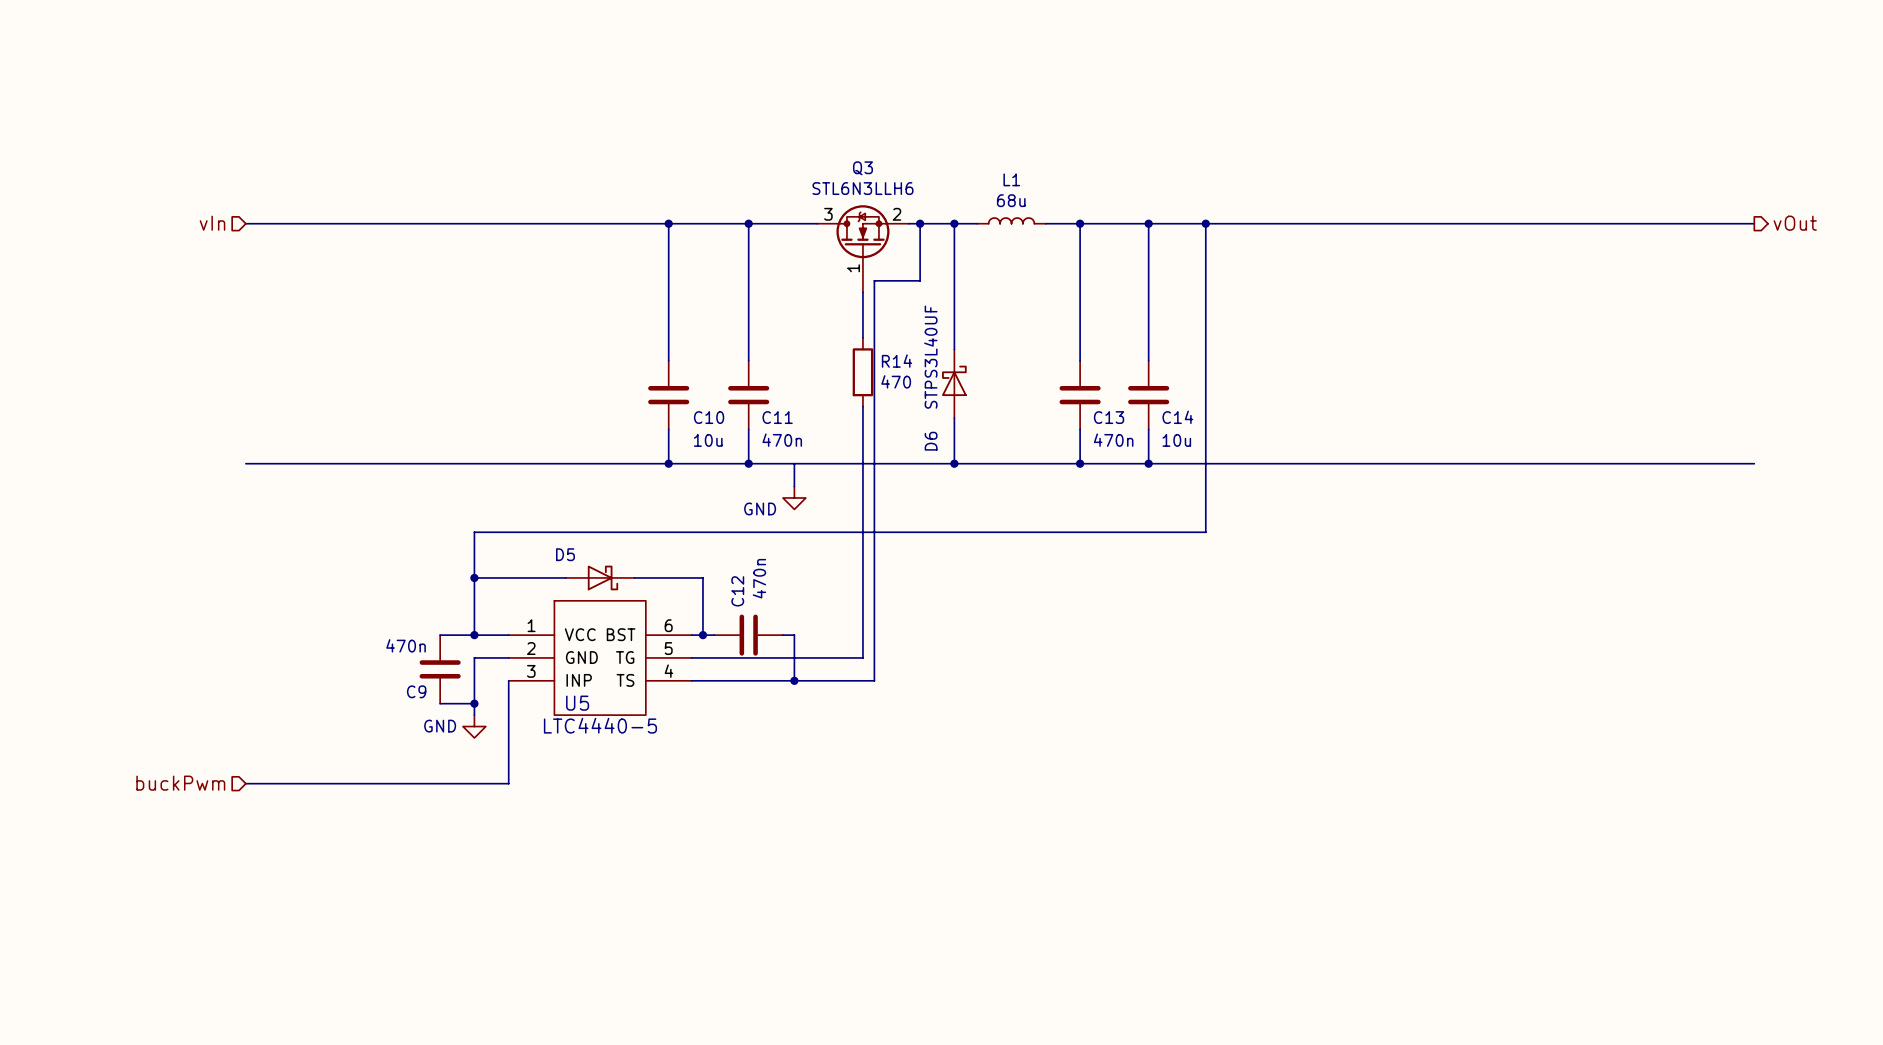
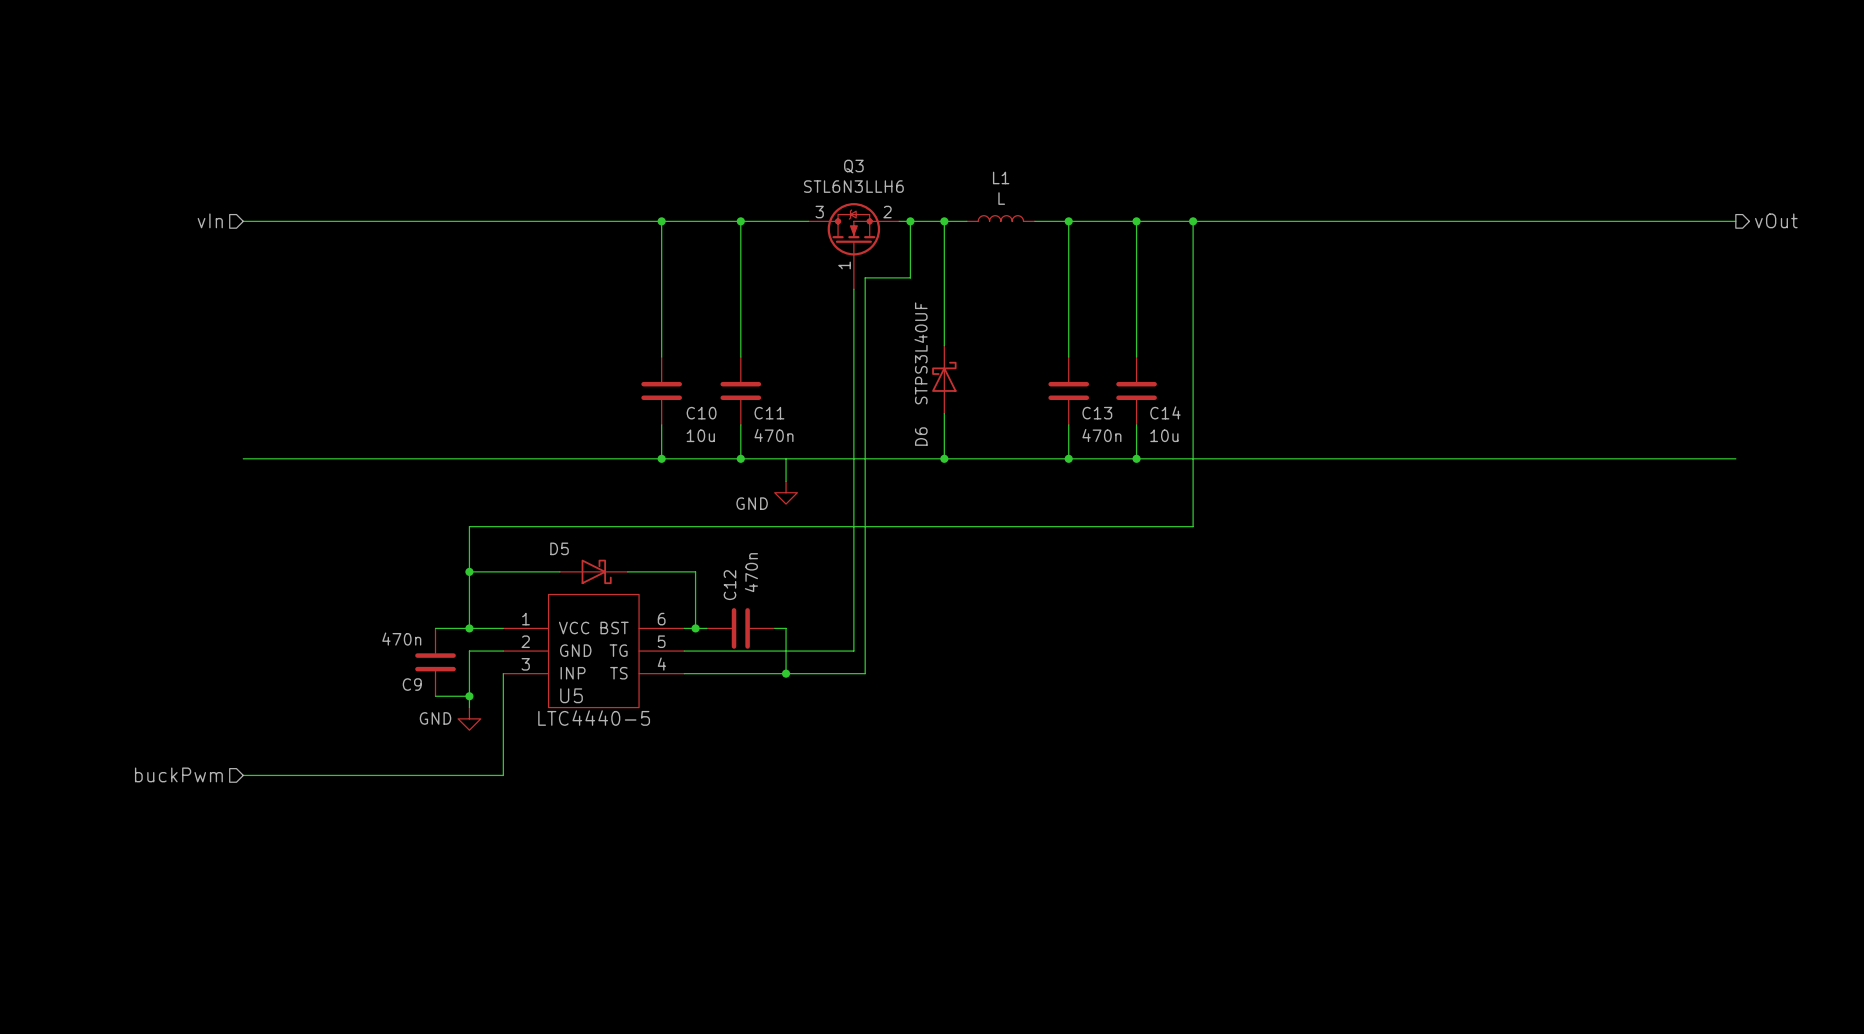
L1 value: 68u (1011, 200) -> L (1001, 198)
wire: none -> (853, 334) (853, 402)
R14: 470 (862, 372) -> none

